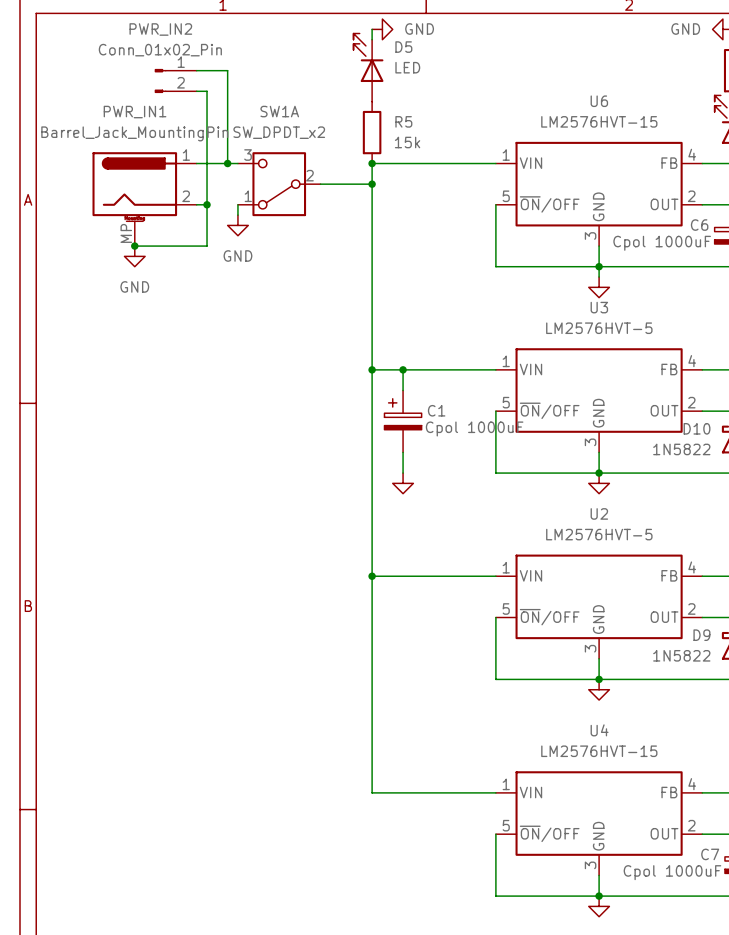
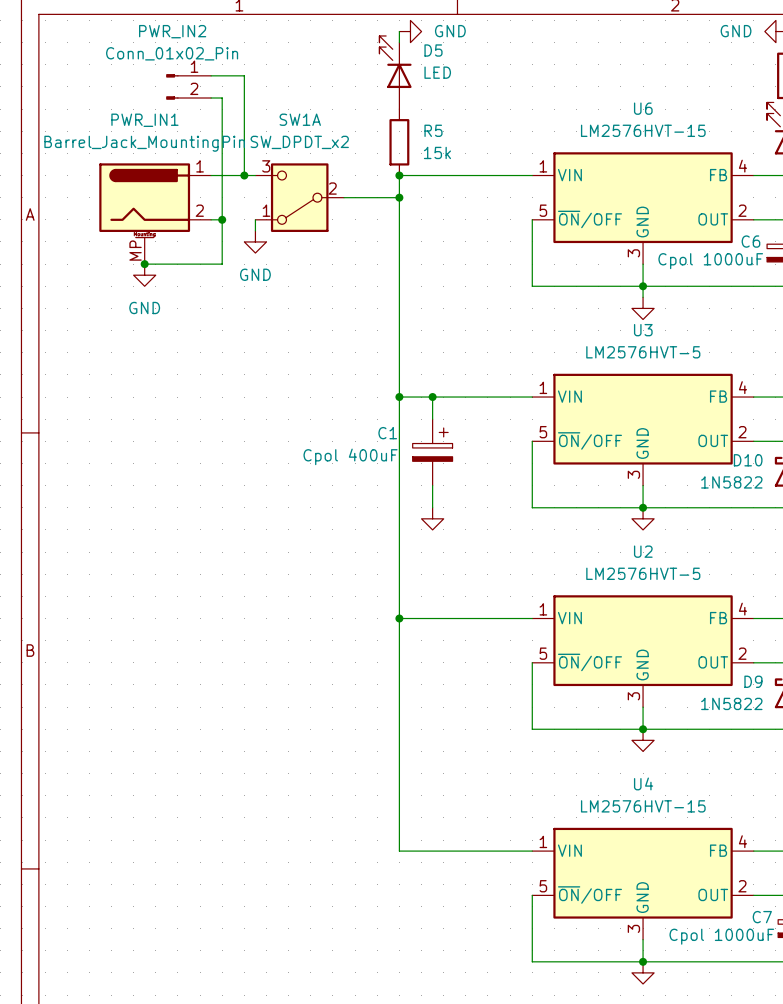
C1 flip: as is (403, 414) -> left-right (432, 444)
C1 value: Cpol 1000uF (474, 428) -> Cpol 400uF (350, 456)

